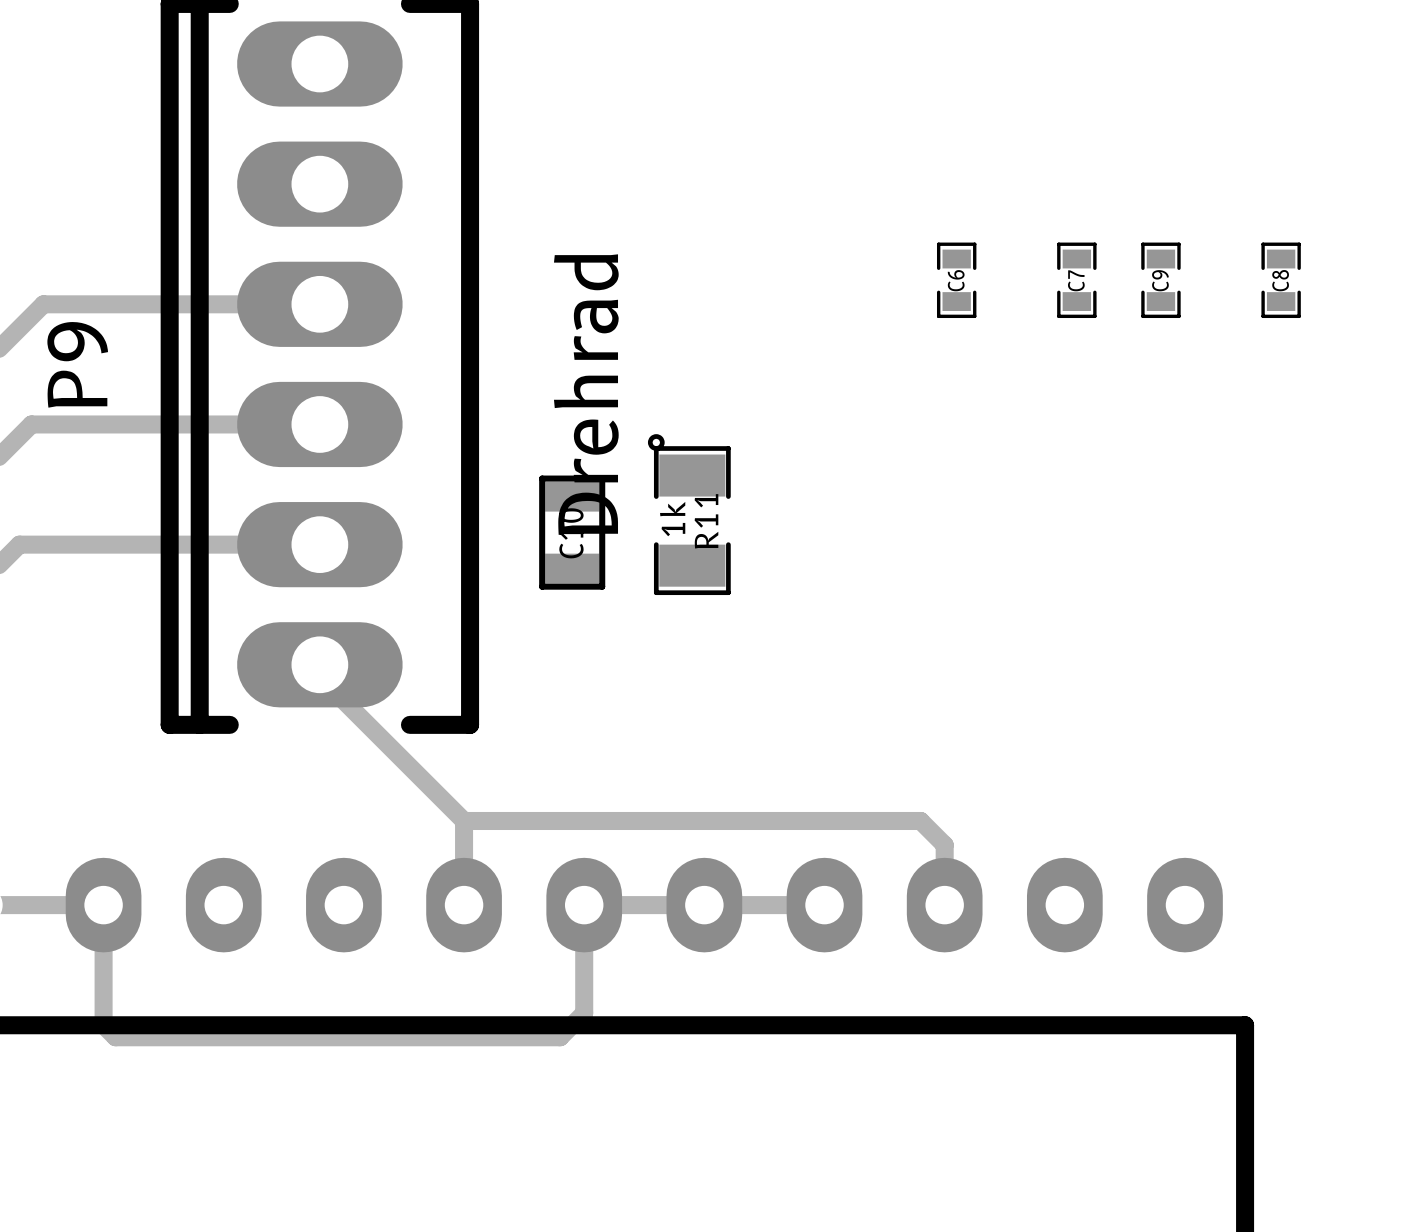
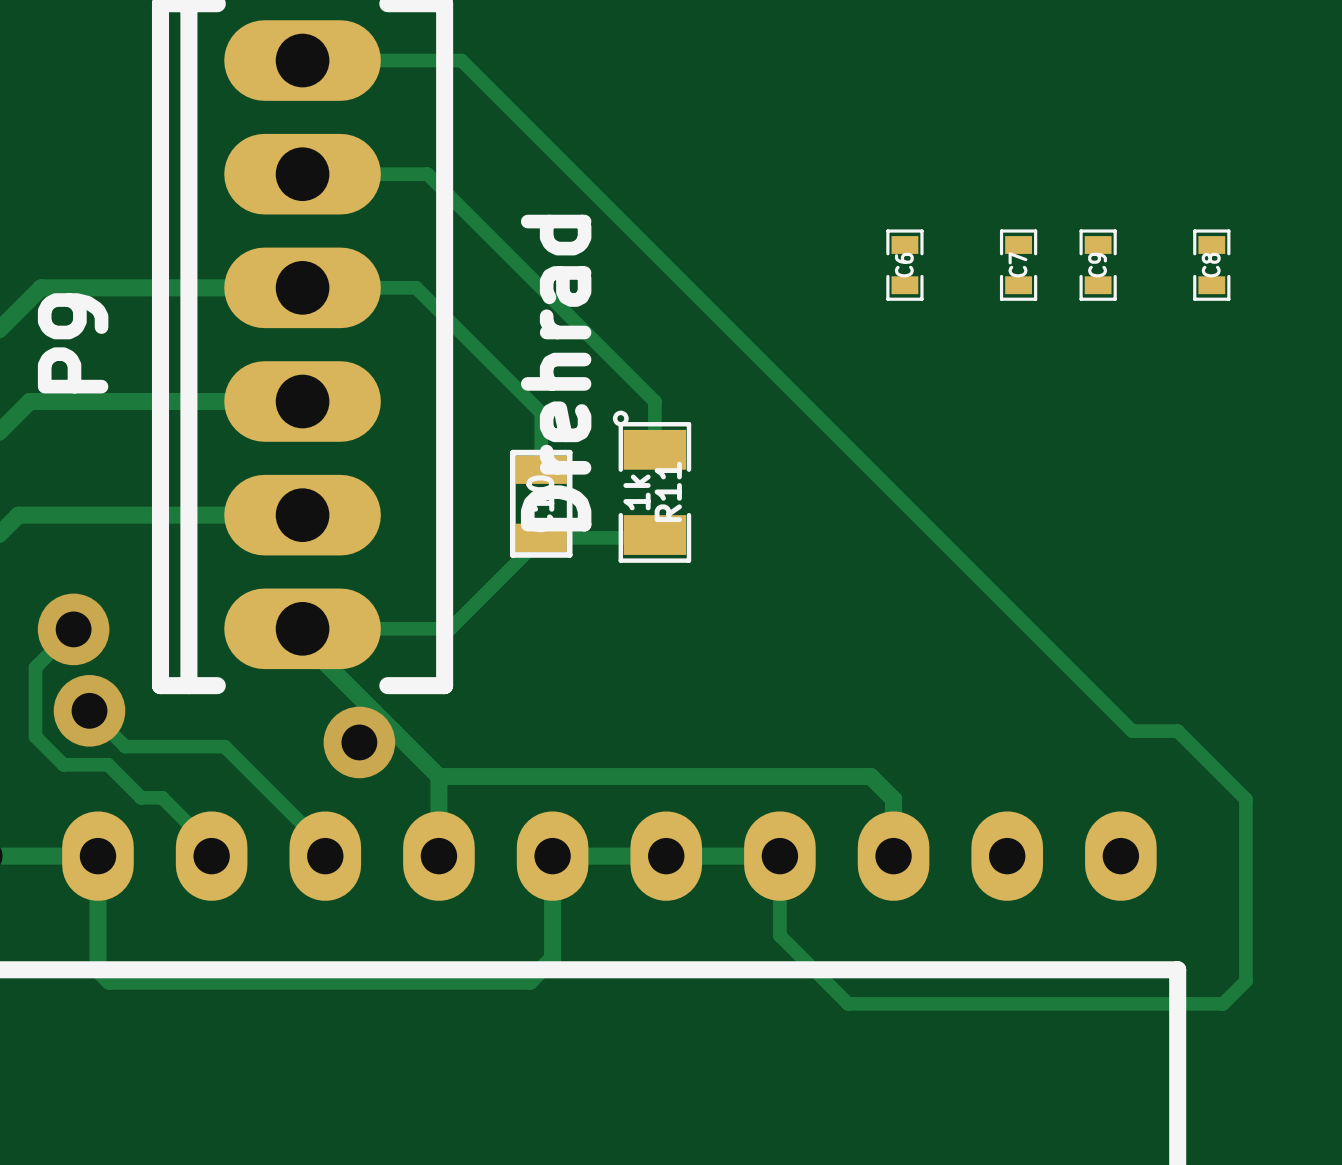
track: none -> (302, 60) (461, 60) (1132, 731) (1177, 731) (1245, 799) (1245, 981) (1223, 1003) (848, 1003) (779, 935) (779, 856)
track: none -> (302, 174) (427, 174) (654, 401) (654, 449)
track: none -> (302, 287) (416, 287) (541, 412) (541, 469)
track: none -> (654, 535) (652, 537) (541, 537) (450, 628) (302, 628)
track: none -> (73, 629) (35, 667) (35, 736) (63, 764) (108, 764) (141, 797) (162, 797) (211, 847) (211, 856)
via: none -> (73, 629)
track: none -> (89, 710) (125, 746) (224, 746) (325, 847) (325, 856)
via: none -> (89, 710)
via: none -> (359, 742)

